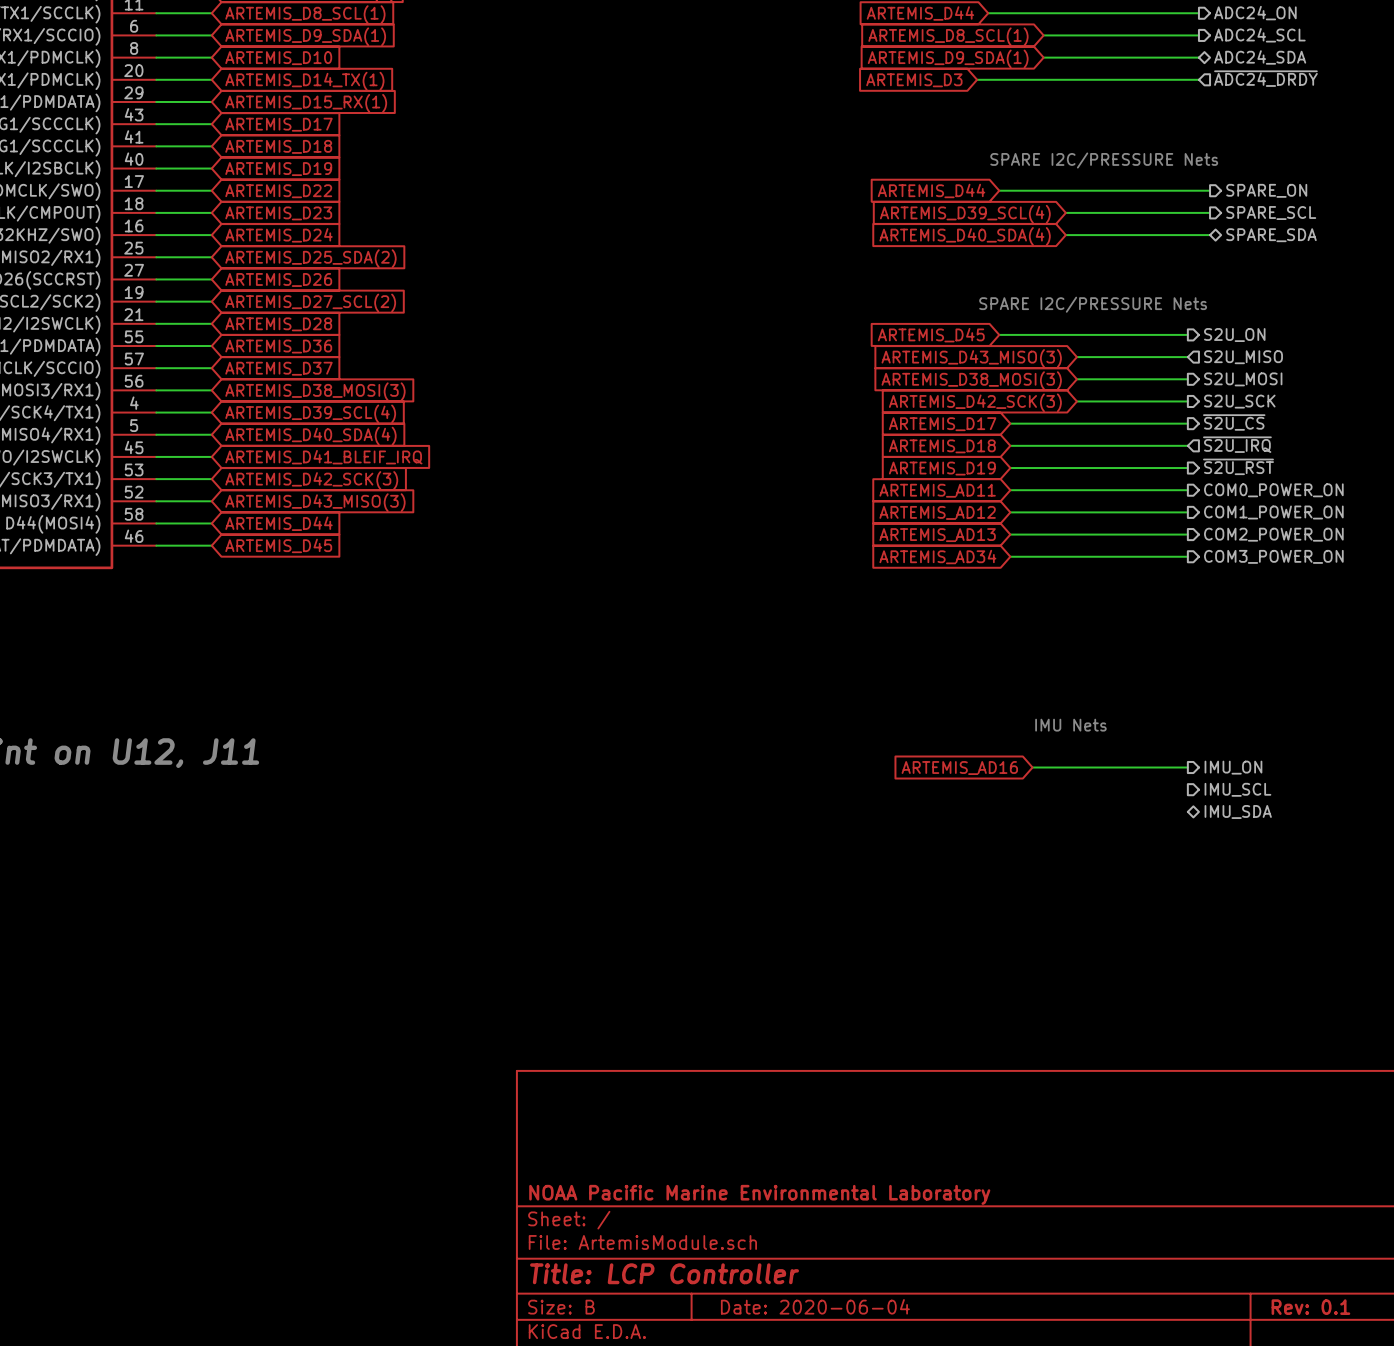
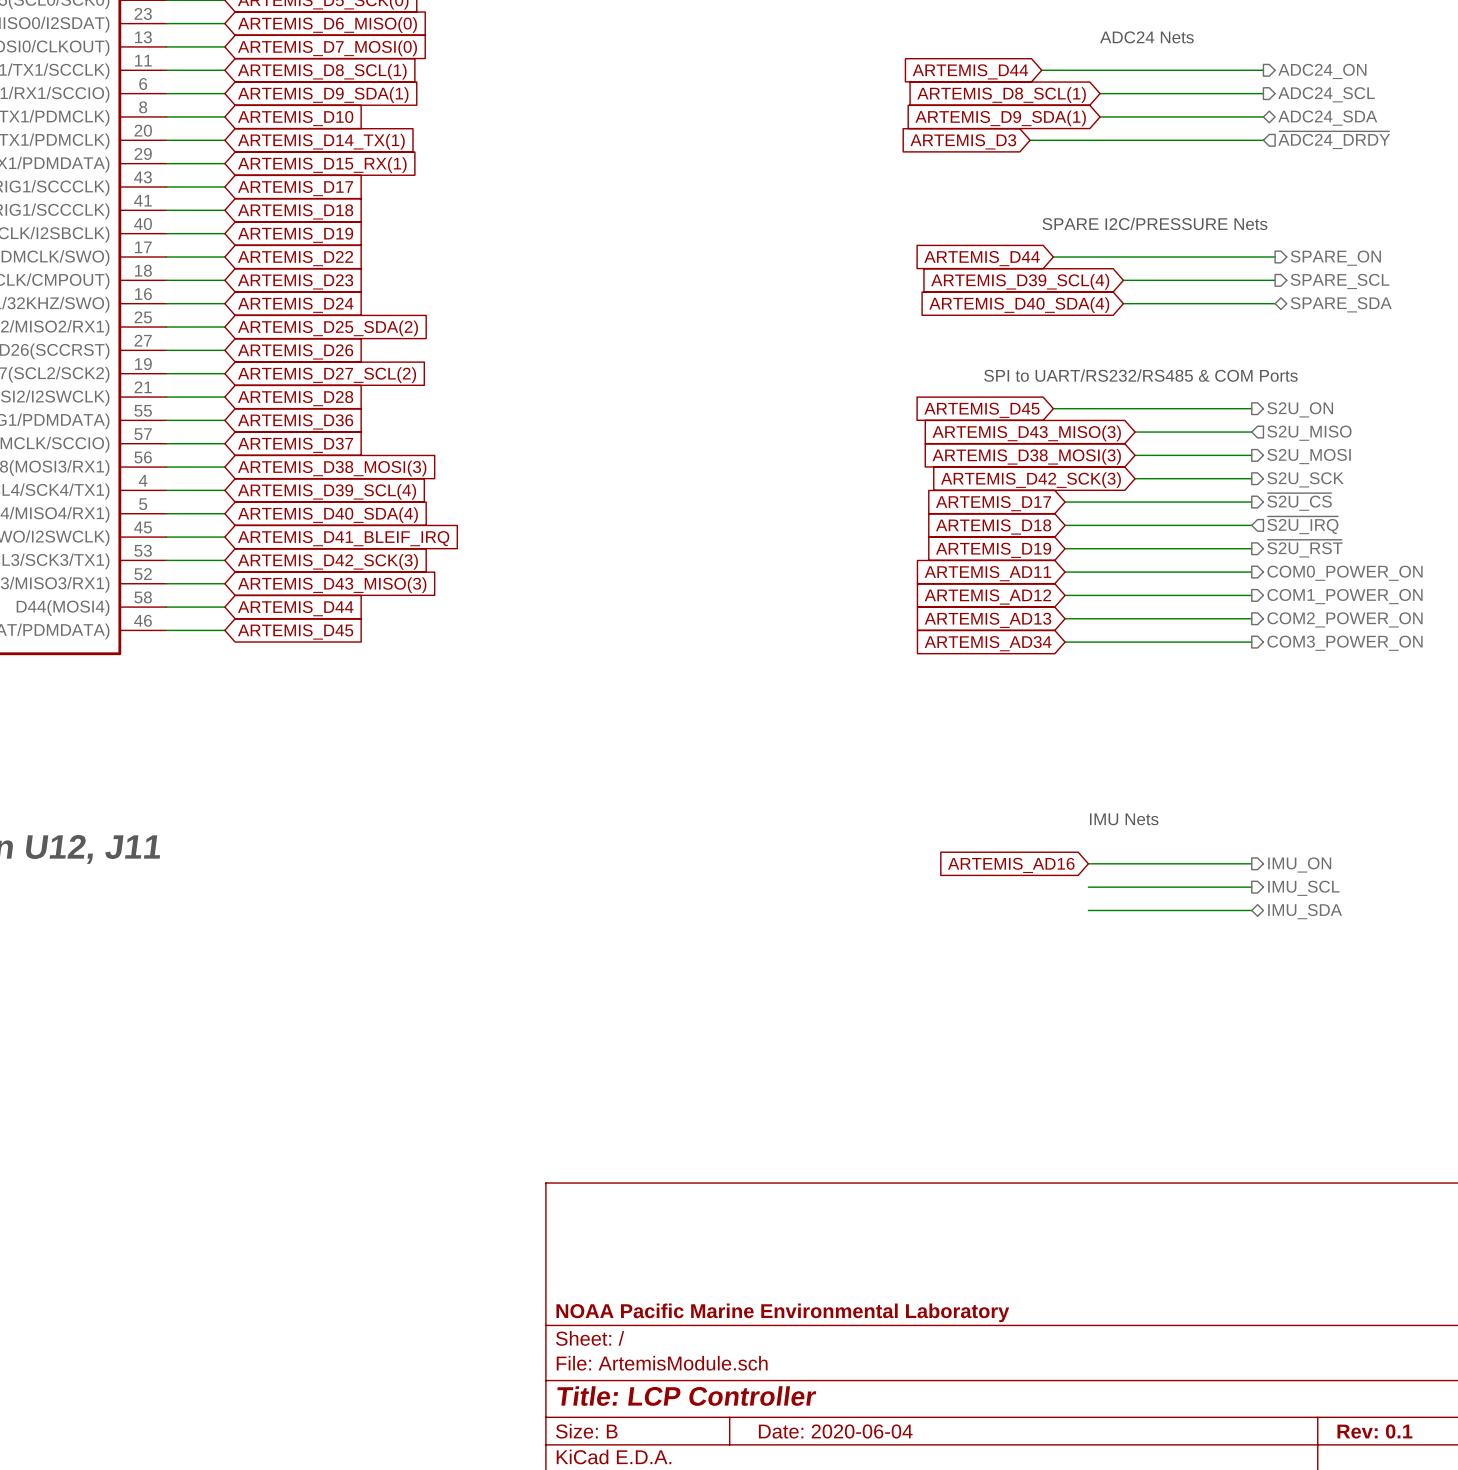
text: SPARE I2C/PRESSURE Nets (1093, 304) -> none
text: none -> SPI to UART/RS232/RS485 & COM Ports (1140, 375)
wire: none -> (1088, 887) (1251, 887)
wire: none -> (1088, 910) (1251, 910)

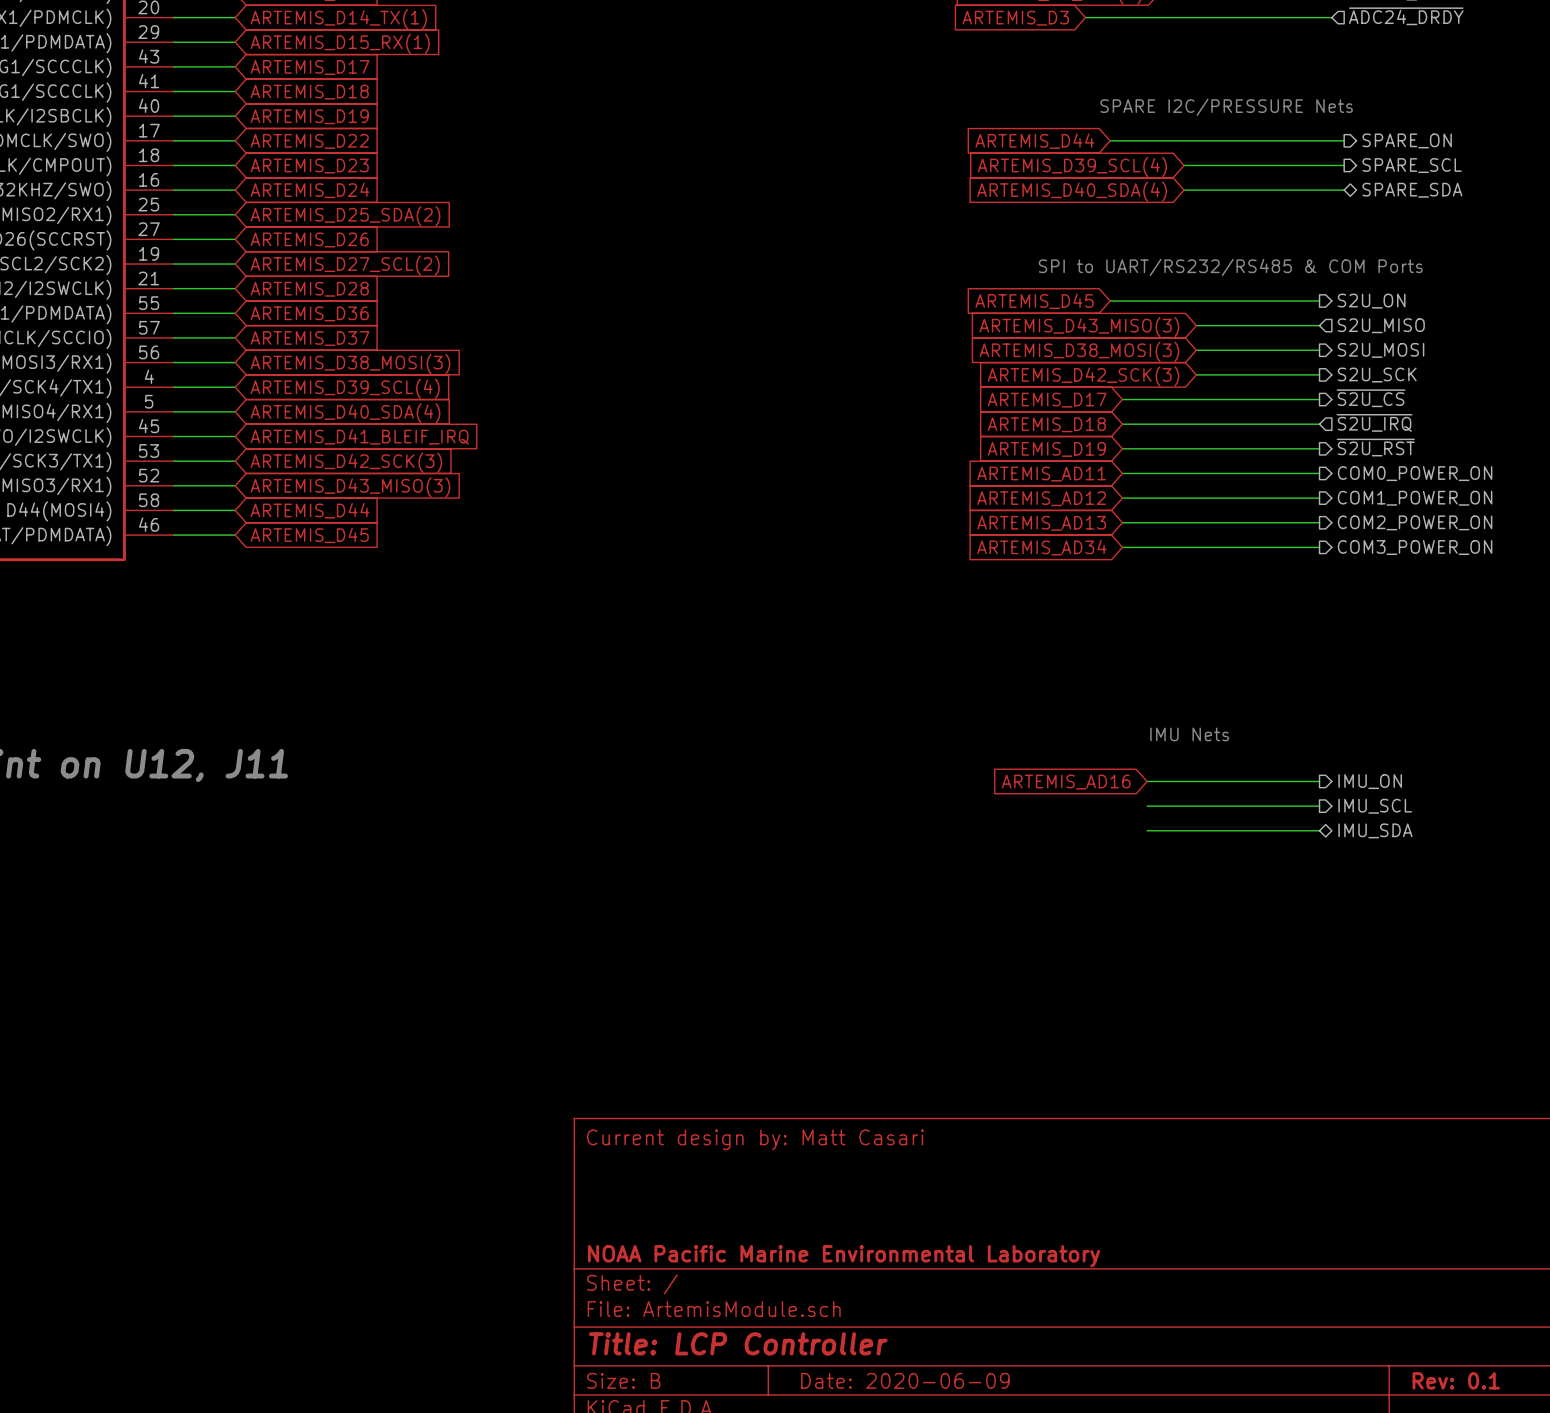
title block: none -> Current design by: Matt Casari (755, 1139)
title block: Date: 2020-06-04 (835, 1431) -> Date: 2020-06-09 (905, 1380)

